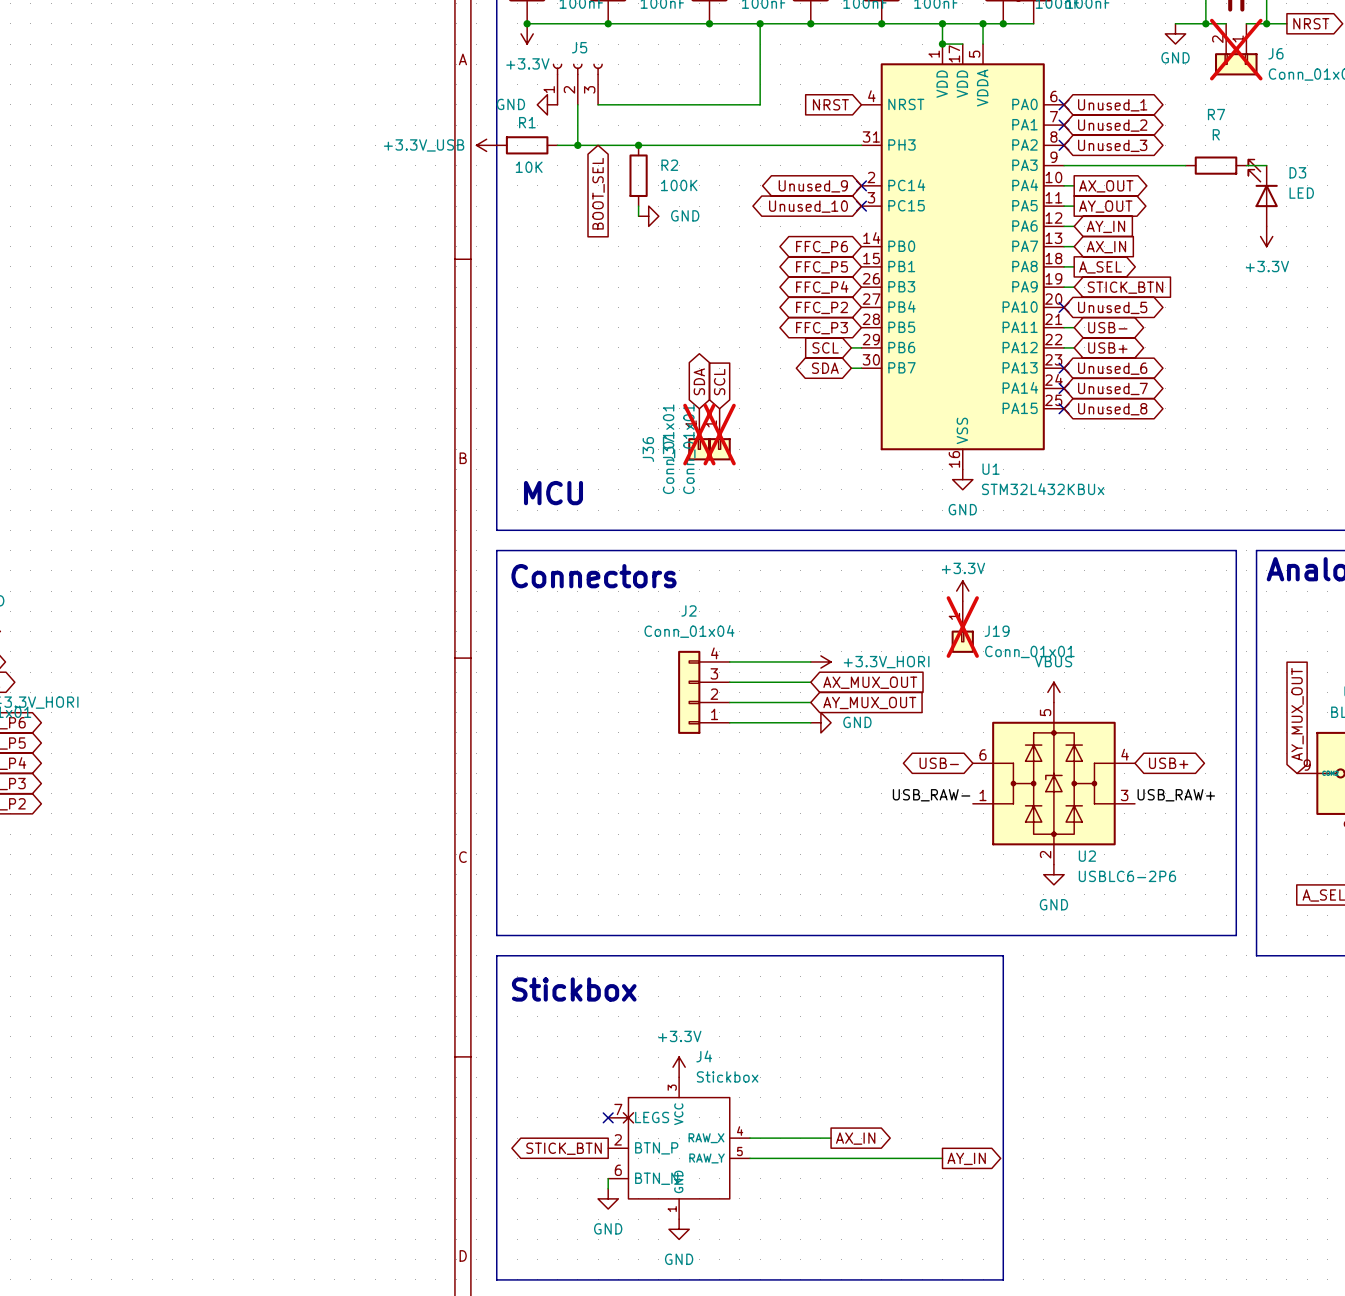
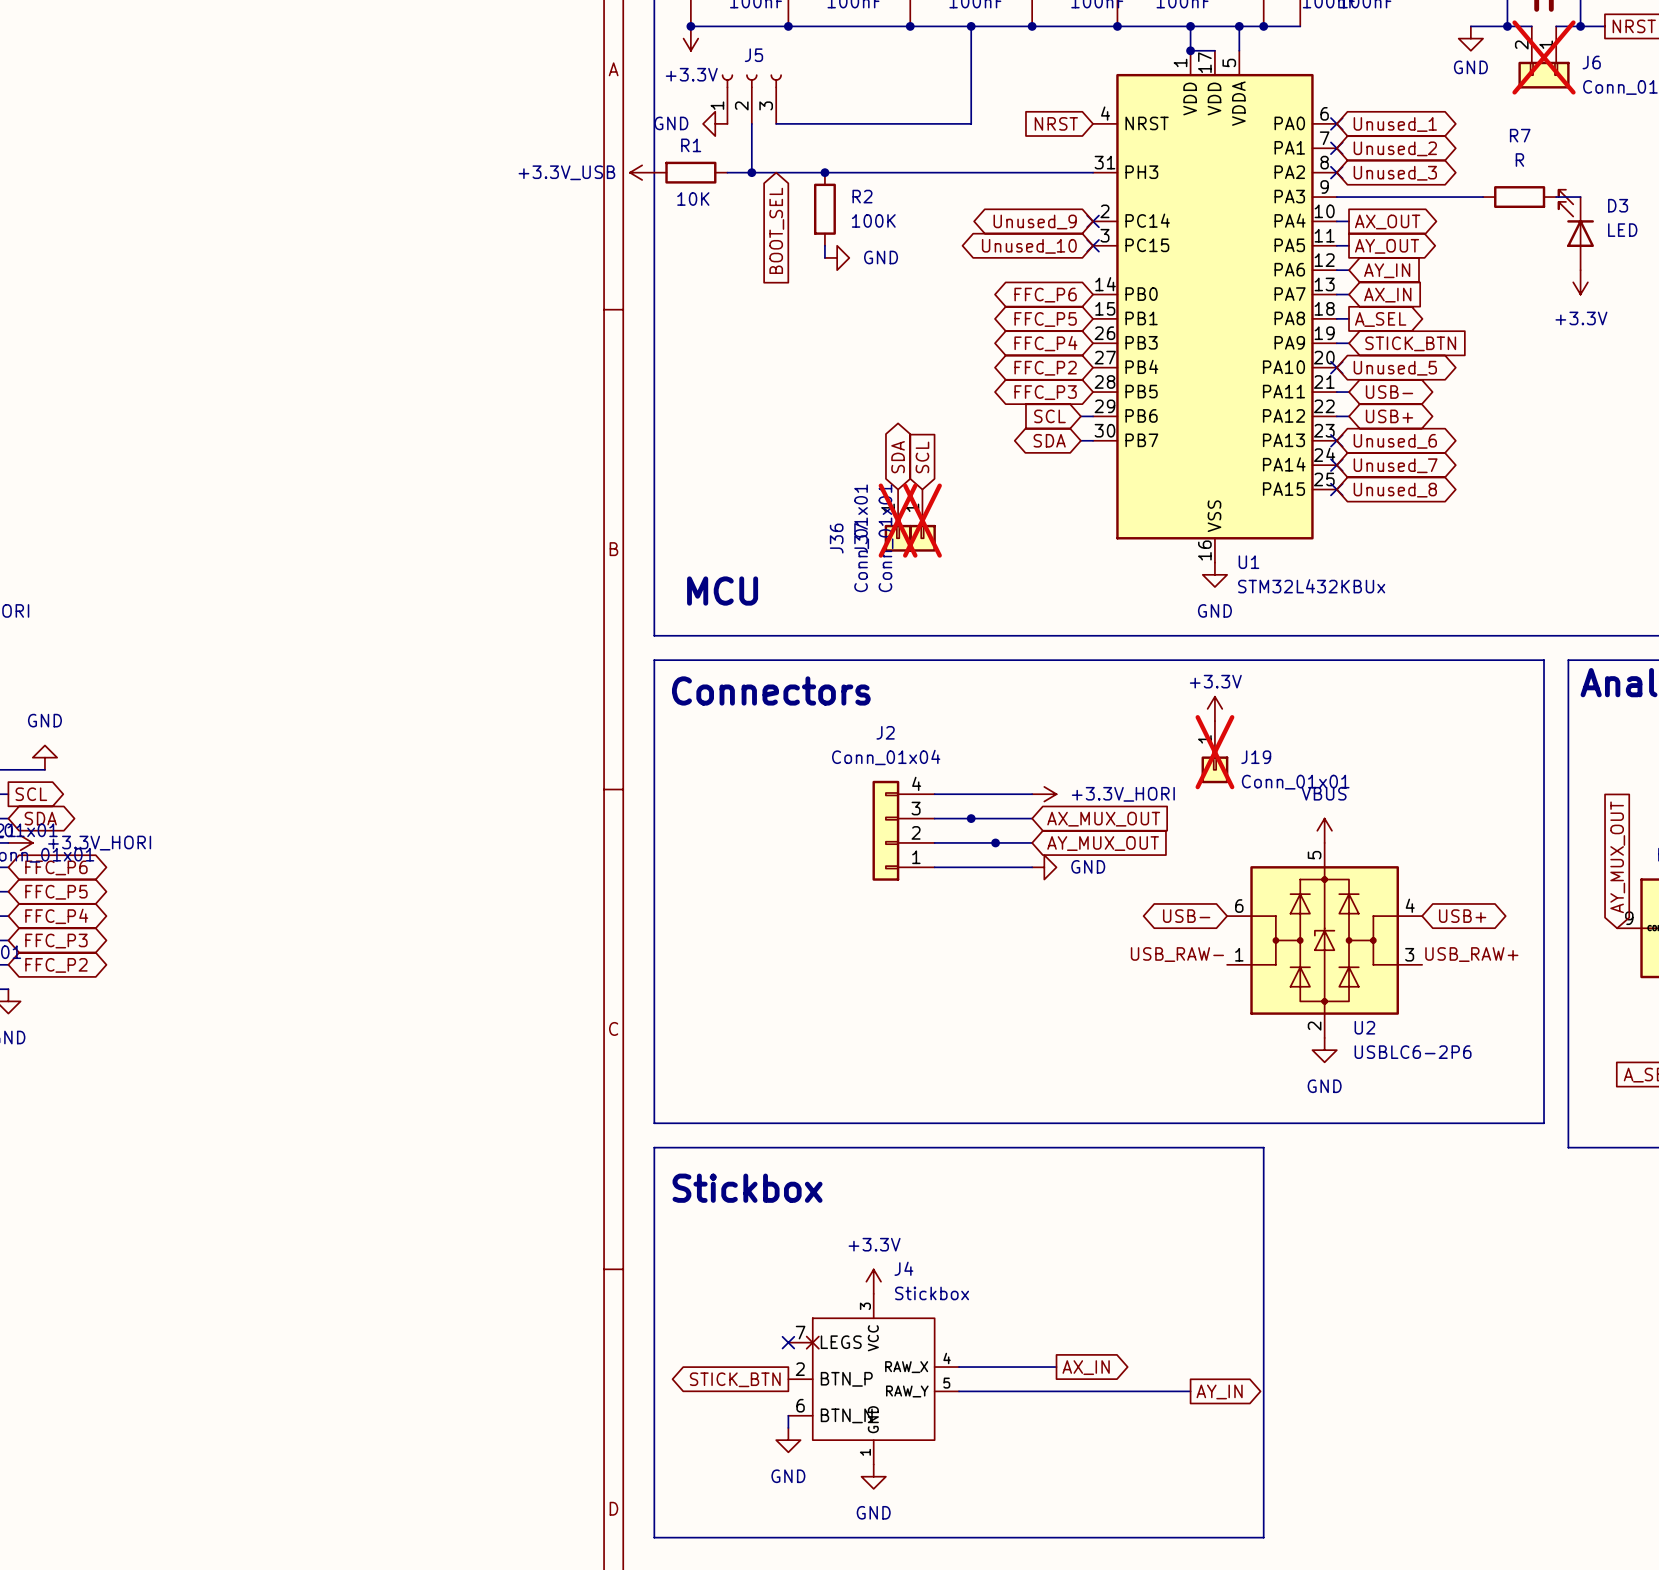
junction: none -> (971, 818)
junction: none -> (995, 842)

